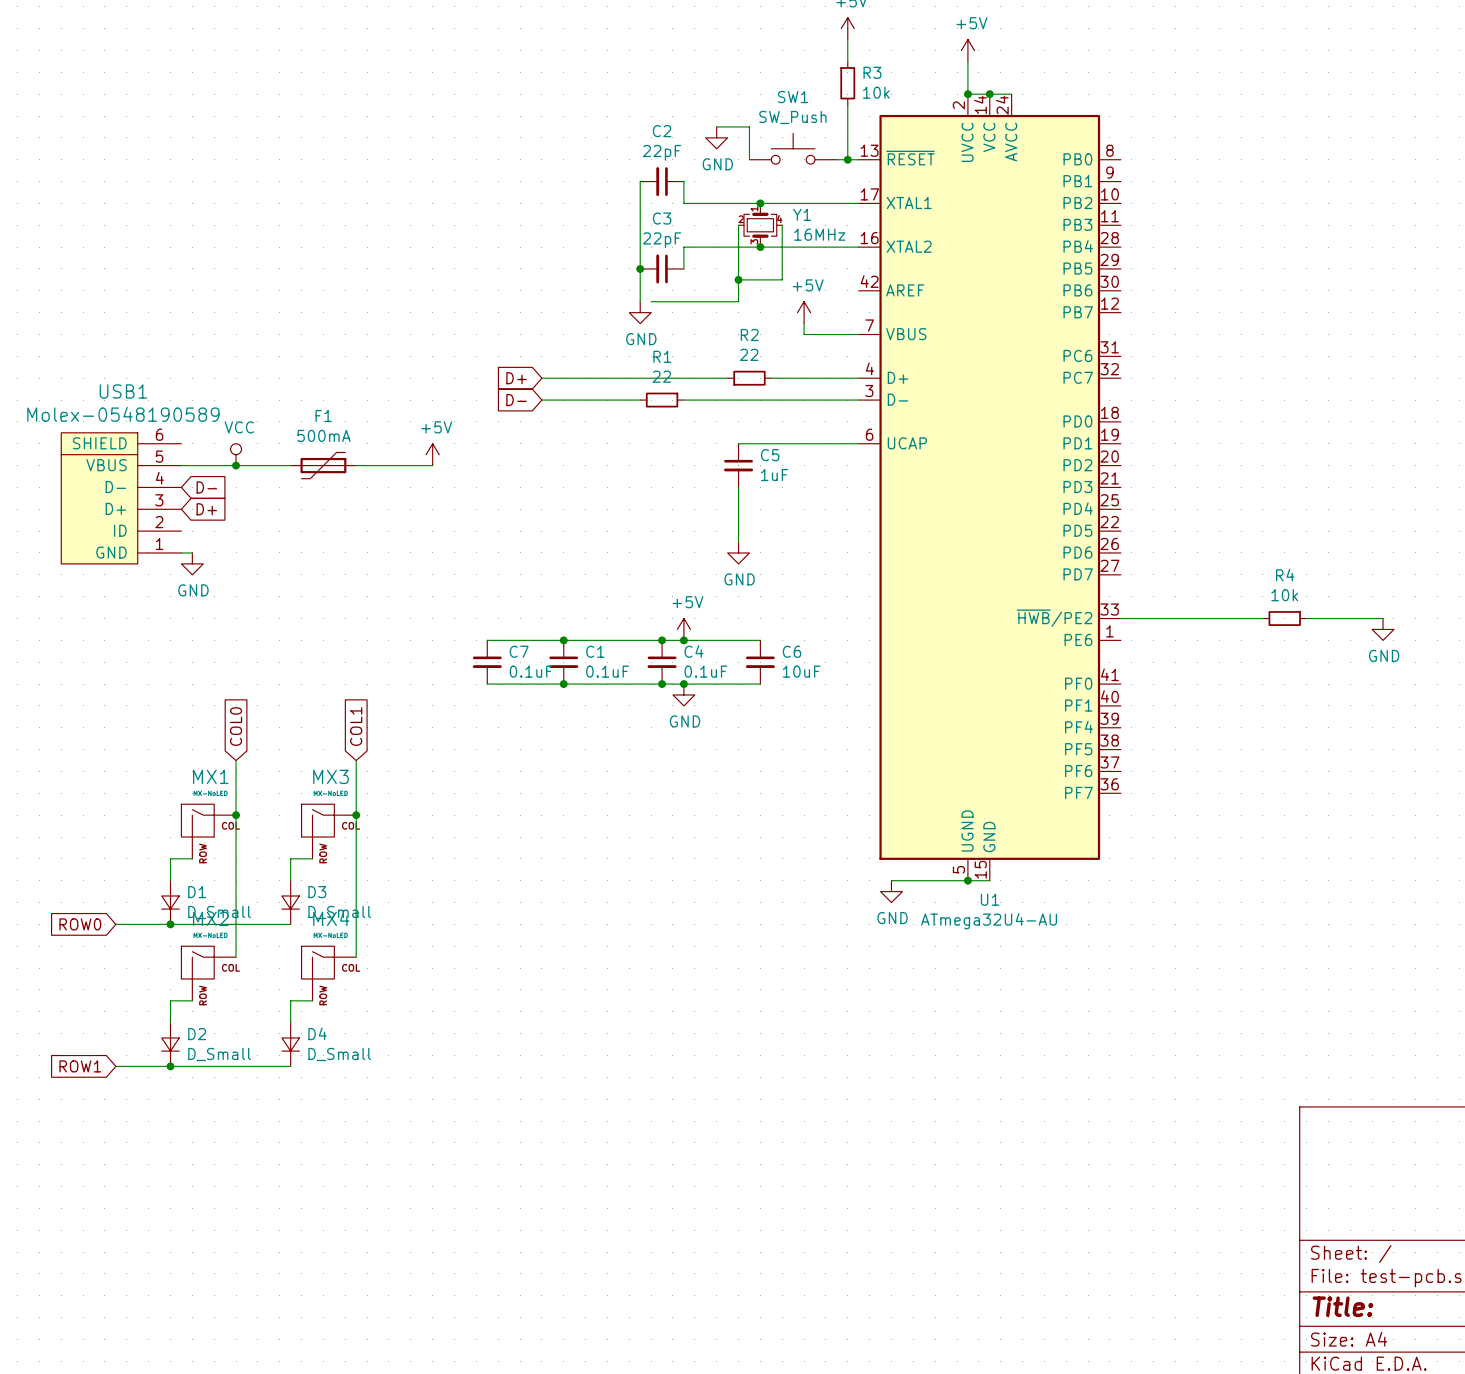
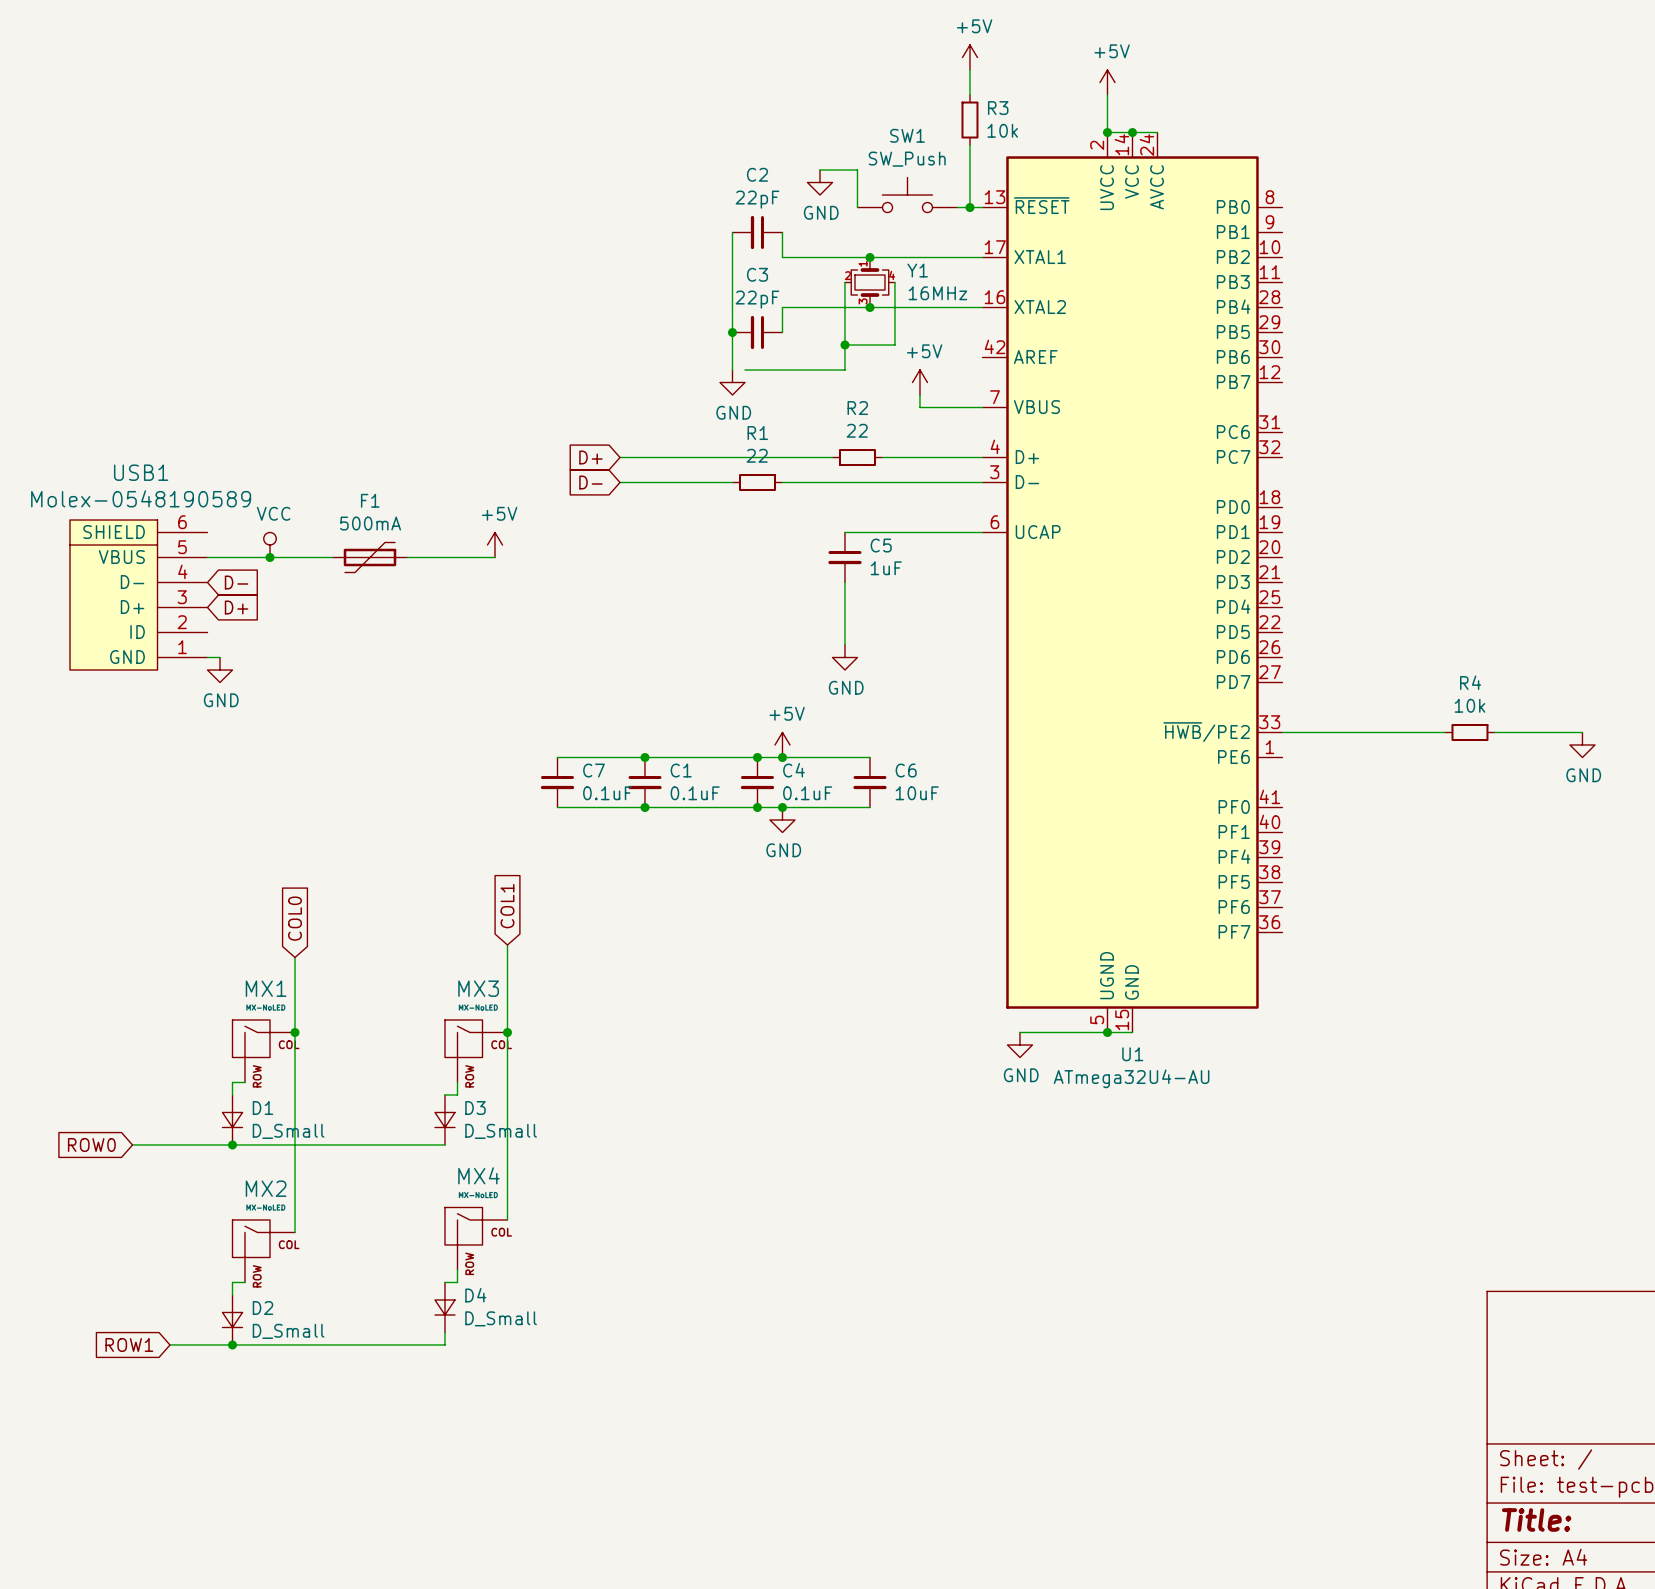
global label position: COL0 (236, 726) -> COL0 (295, 918)
global label position: COL1 (356, 726) -> COL1 (507, 906)
wire: (236, 760) (236, 957) -> none
wire: (356, 760) (356, 957) -> none
wire: none -> (507, 944) (507, 1219)
junction: (236, 815) -> none
wire: none -> (295, 957) (295, 1232)
junction: (356, 815) -> none
MX1 position: (208, 831) -> (263, 1051)
MX3 position: (328, 831) -> (476, 1051)
wire: (192, 858) (170, 858) (170, 880) -> none
wire: (312, 858) (290, 858) (290, 880) -> none
junction: none -> (295, 1032)
junction: none -> (507, 1032)
D1 position: (170, 902) -> (232, 1119)
D3 position: (290, 902) -> (444, 1119)
global label position: ROW0 (80, 924) -> ROW0 (91, 1144)
wire: (115, 924) (203, 924) -> (232, 1094) (232, 1082)
junction: (170, 924) -> none
wire: (214, 924) (290, 924) -> none
wire: none -> (457, 1082) (457, 1094) (444, 1094)
MX2 position: (208, 973) -> (263, 1251)
MX4 position: (328, 973) -> (476, 1238)
wire: none -> (132, 1144) (444, 1144)
junction: none -> (232, 1144)
wire: (192, 1000) (170, 1000) (170, 1022) -> none
wire: (312, 1000) (290, 1000) (290, 1022) -> none
D2 position: (170, 1044) -> (232, 1319)
D4 position: (290, 1044) -> (444, 1307)
global label position: ROW1 (80, 1066) -> ROW1 (129, 1344)
wire: (115, 1066) (290, 1066) -> none
junction: (170, 1066) -> none
wire: none -> (457, 1269) (457, 1282) (444, 1282)
wire: none -> (245, 1282) (232, 1282) (232, 1294)
wire: none -> (444, 1332) (444, 1344) (170, 1344)
junction: none -> (232, 1344)

